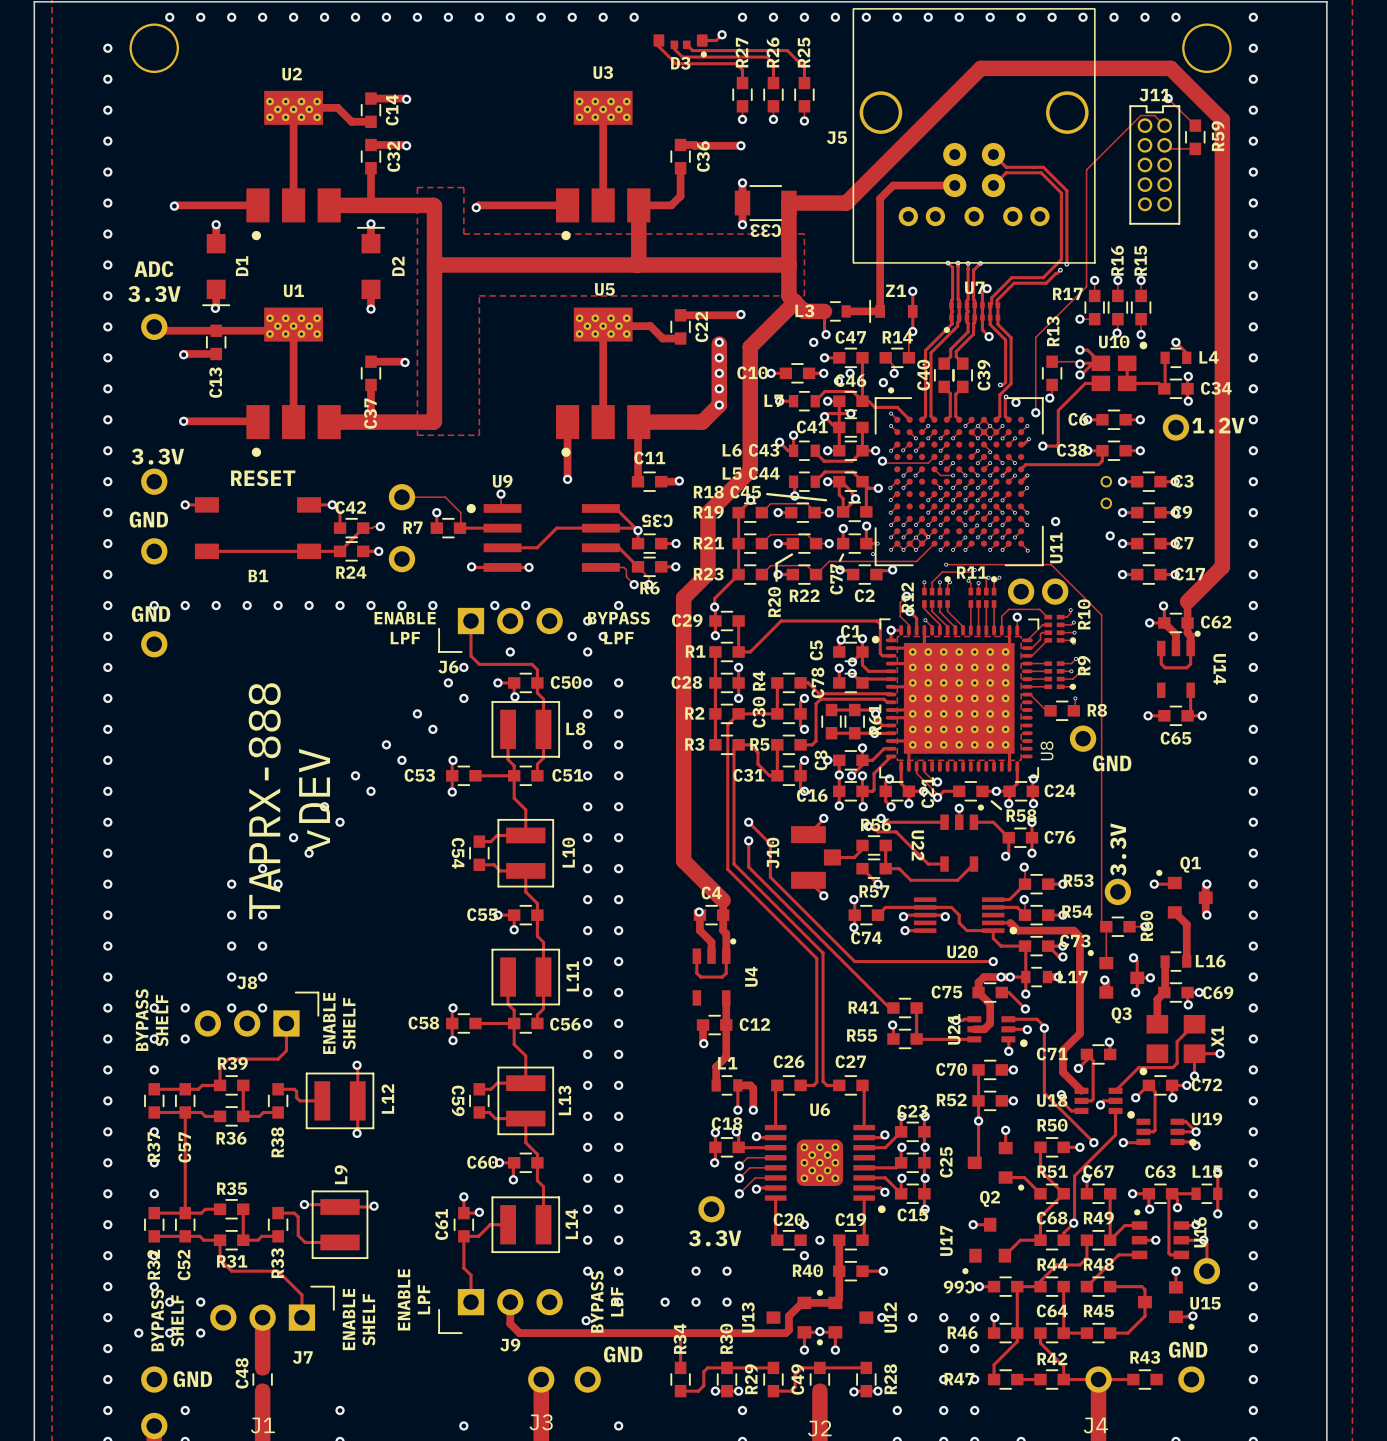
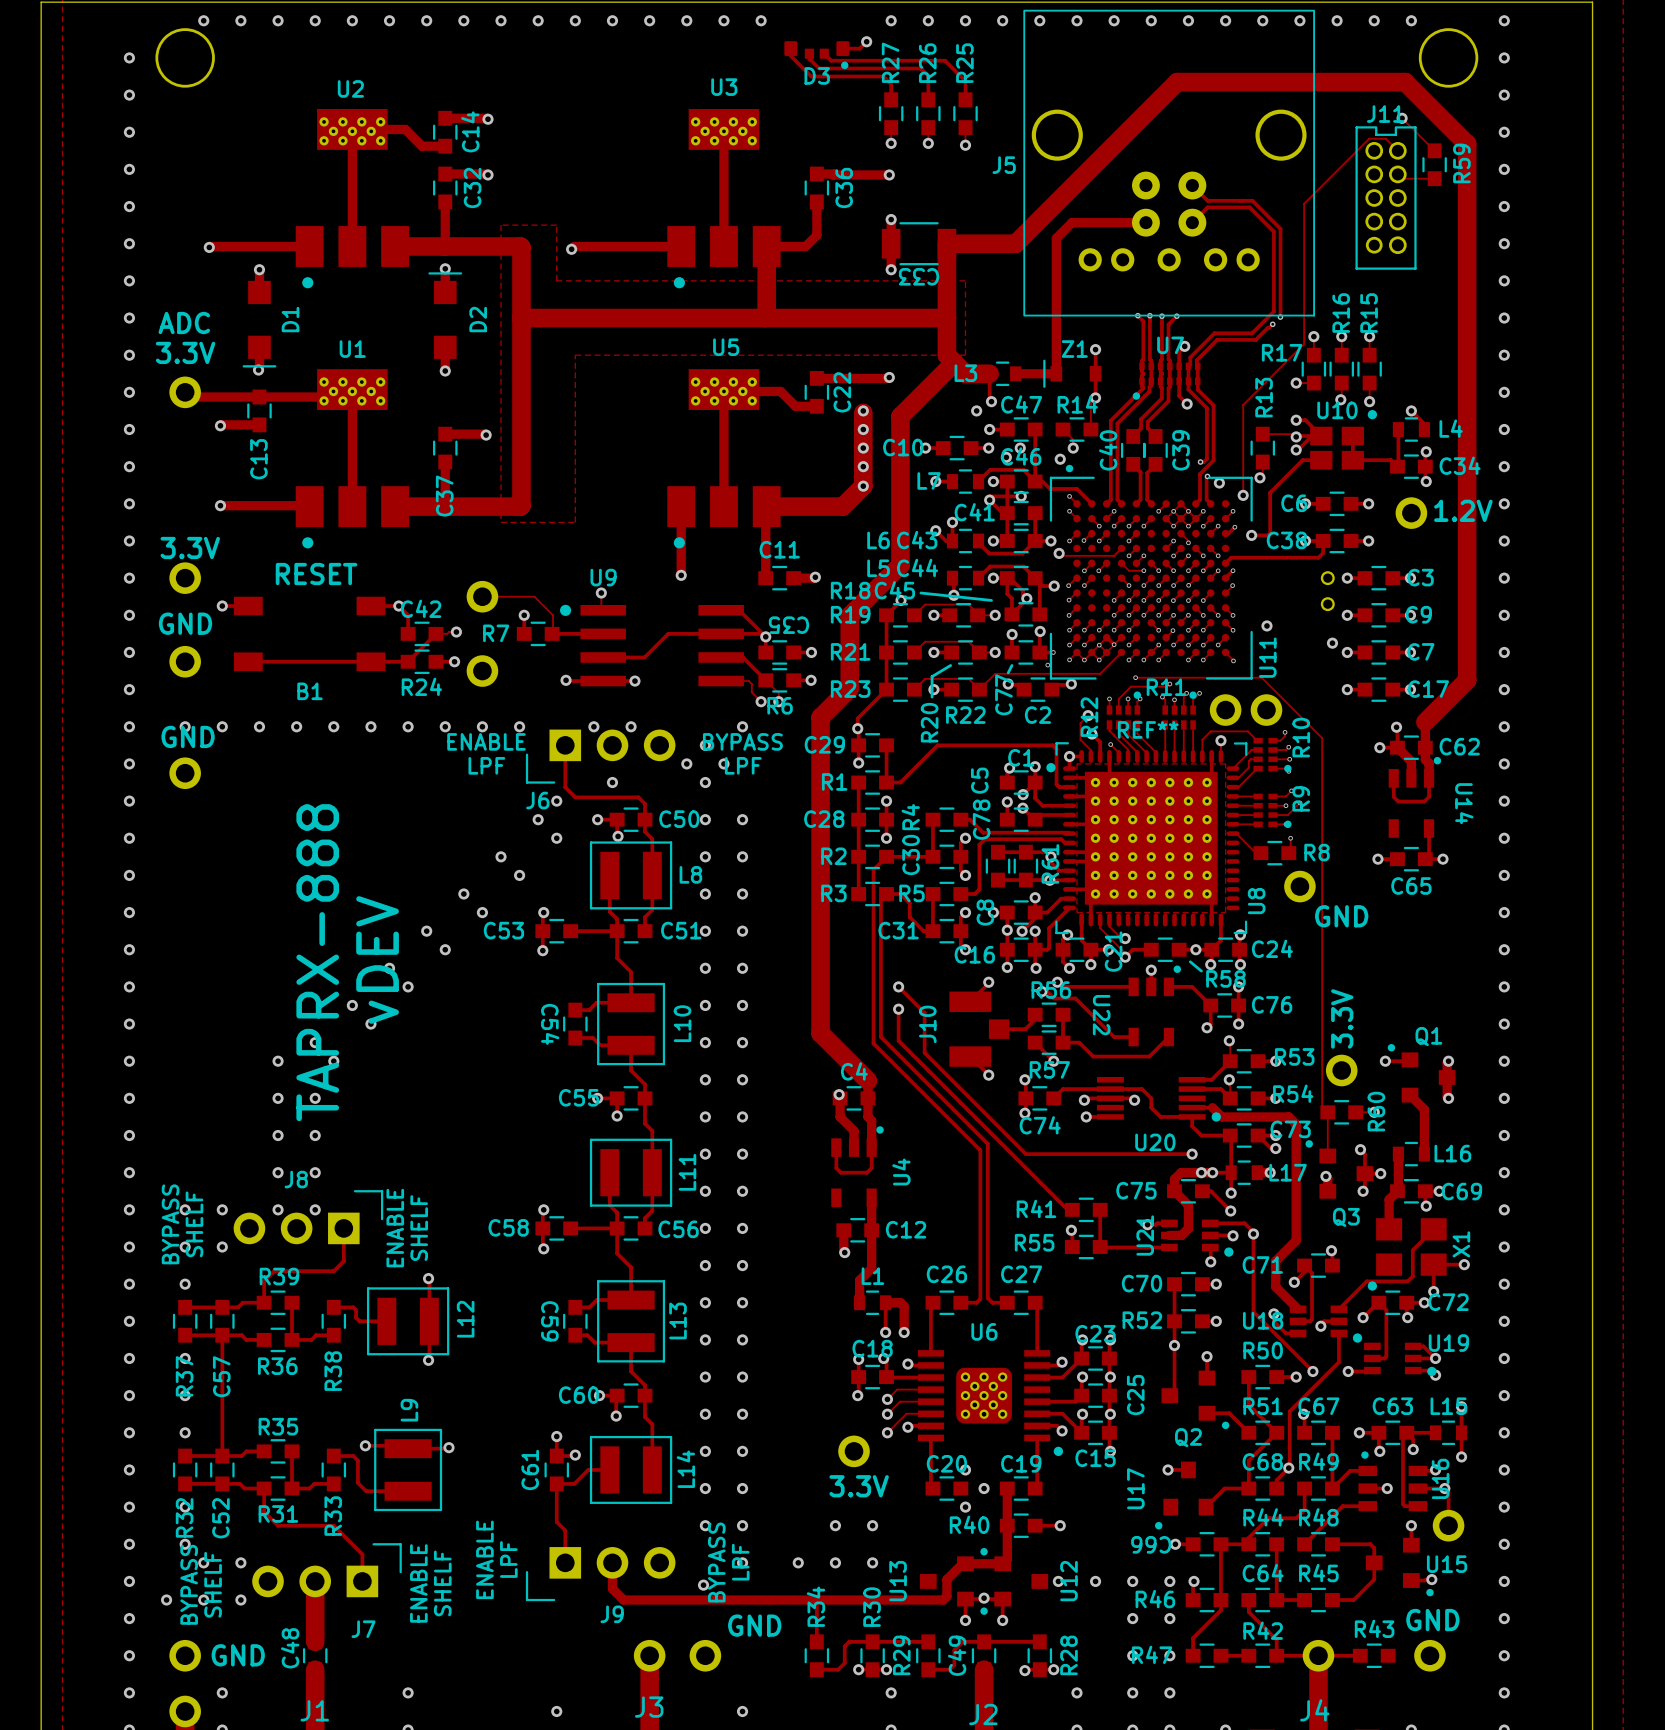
U8 text: none -> REF** (1148, 729)

